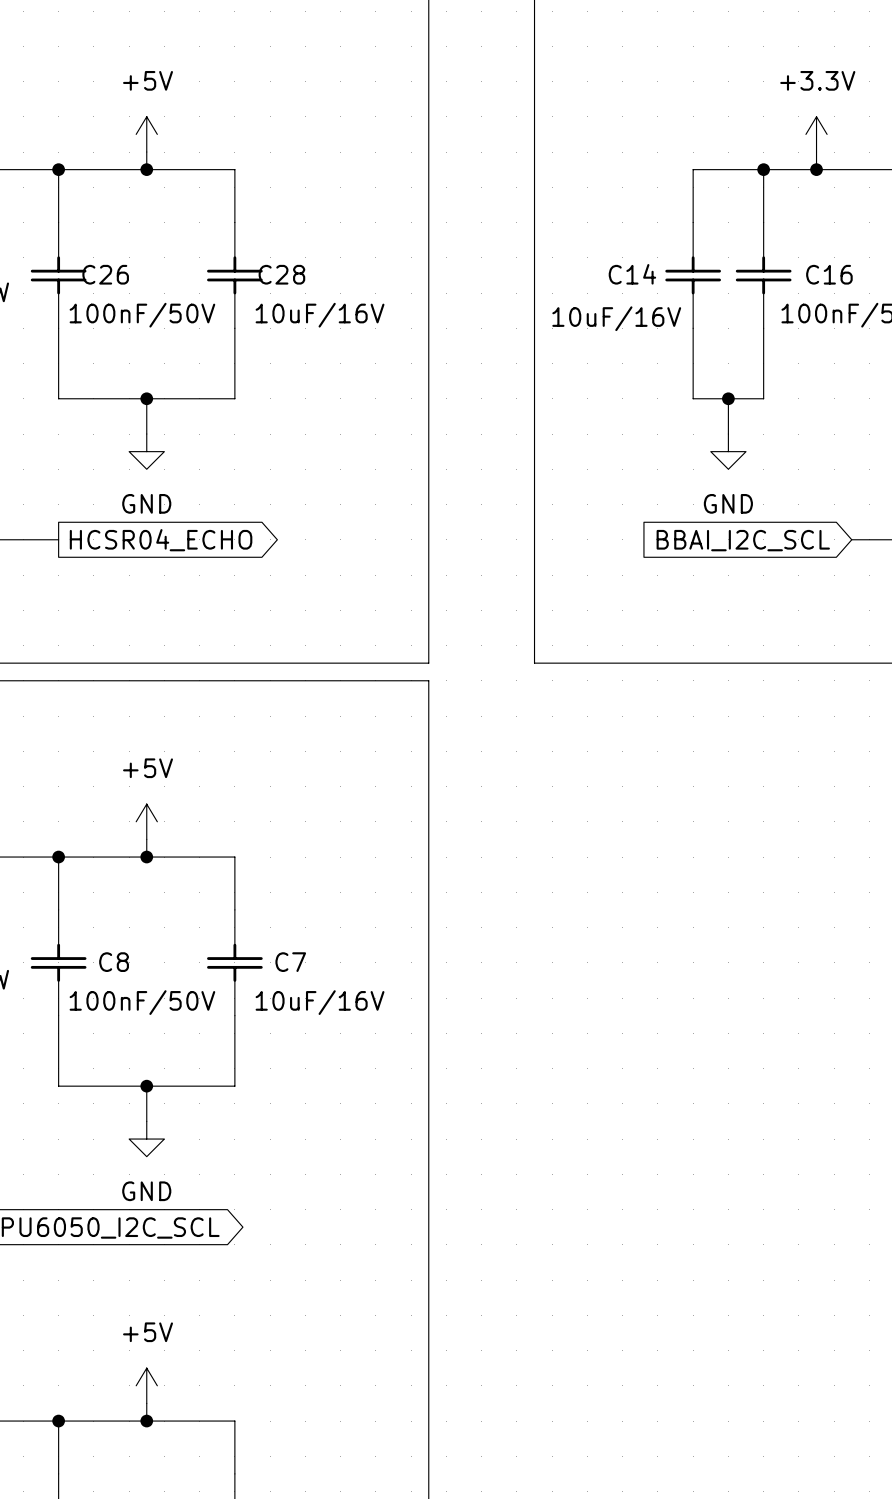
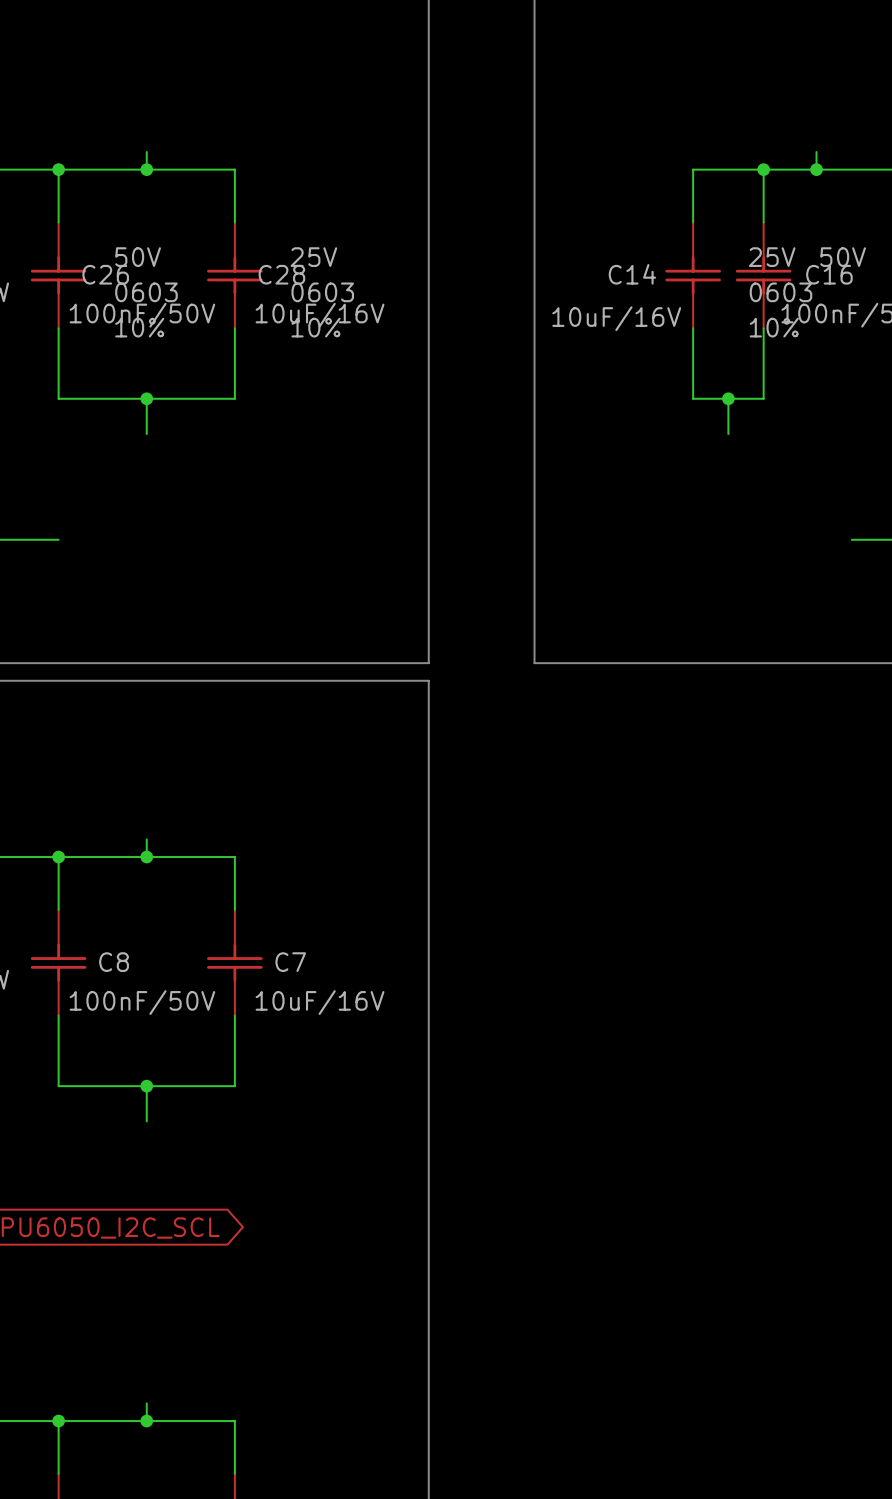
power symbol: +5V (146, 134) -> none
power symbol: +3.3V (816, 134) -> none
C26 text: none -> 50V (138, 257)
C28 text: none -> 25V (313, 257)
C14 text: none -> 25V (772, 257)
C16 text: none -> 50V (843, 257)
C26 text: none -> 0603 (146, 292)
C28 text: none -> 0603 (322, 292)
C14 text: none -> 0603 (780, 292)
C26 text: none -> 10% (139, 327)
C28 text: none -> 10% (316, 327)
C14 text: none -> 10% (774, 327)
power symbol: GND (146, 451) -> none
power symbol: GND (728, 451) -> none
global label: HCSR04_ECHO (161, 540) -> none
global label: BBAI_I2C_SCL (743, 540) -> none
power symbol: +5V (146, 821) -> none
power symbol: GND (146, 1139) -> none
power symbol: +5V (146, 1385) -> none

